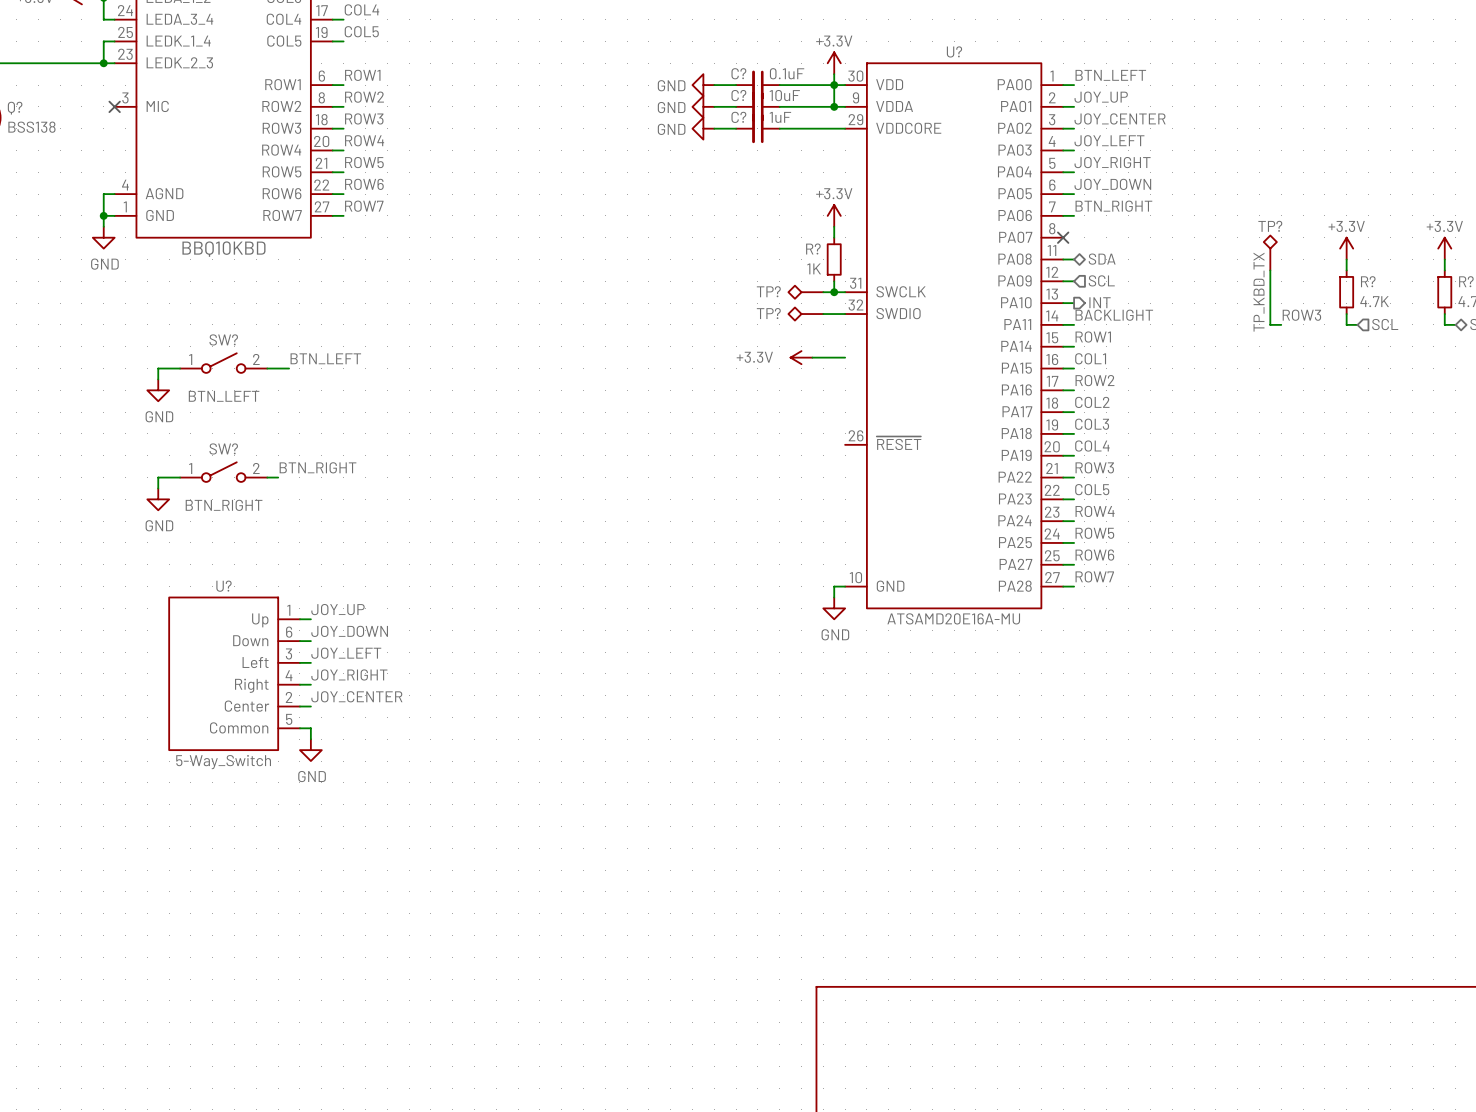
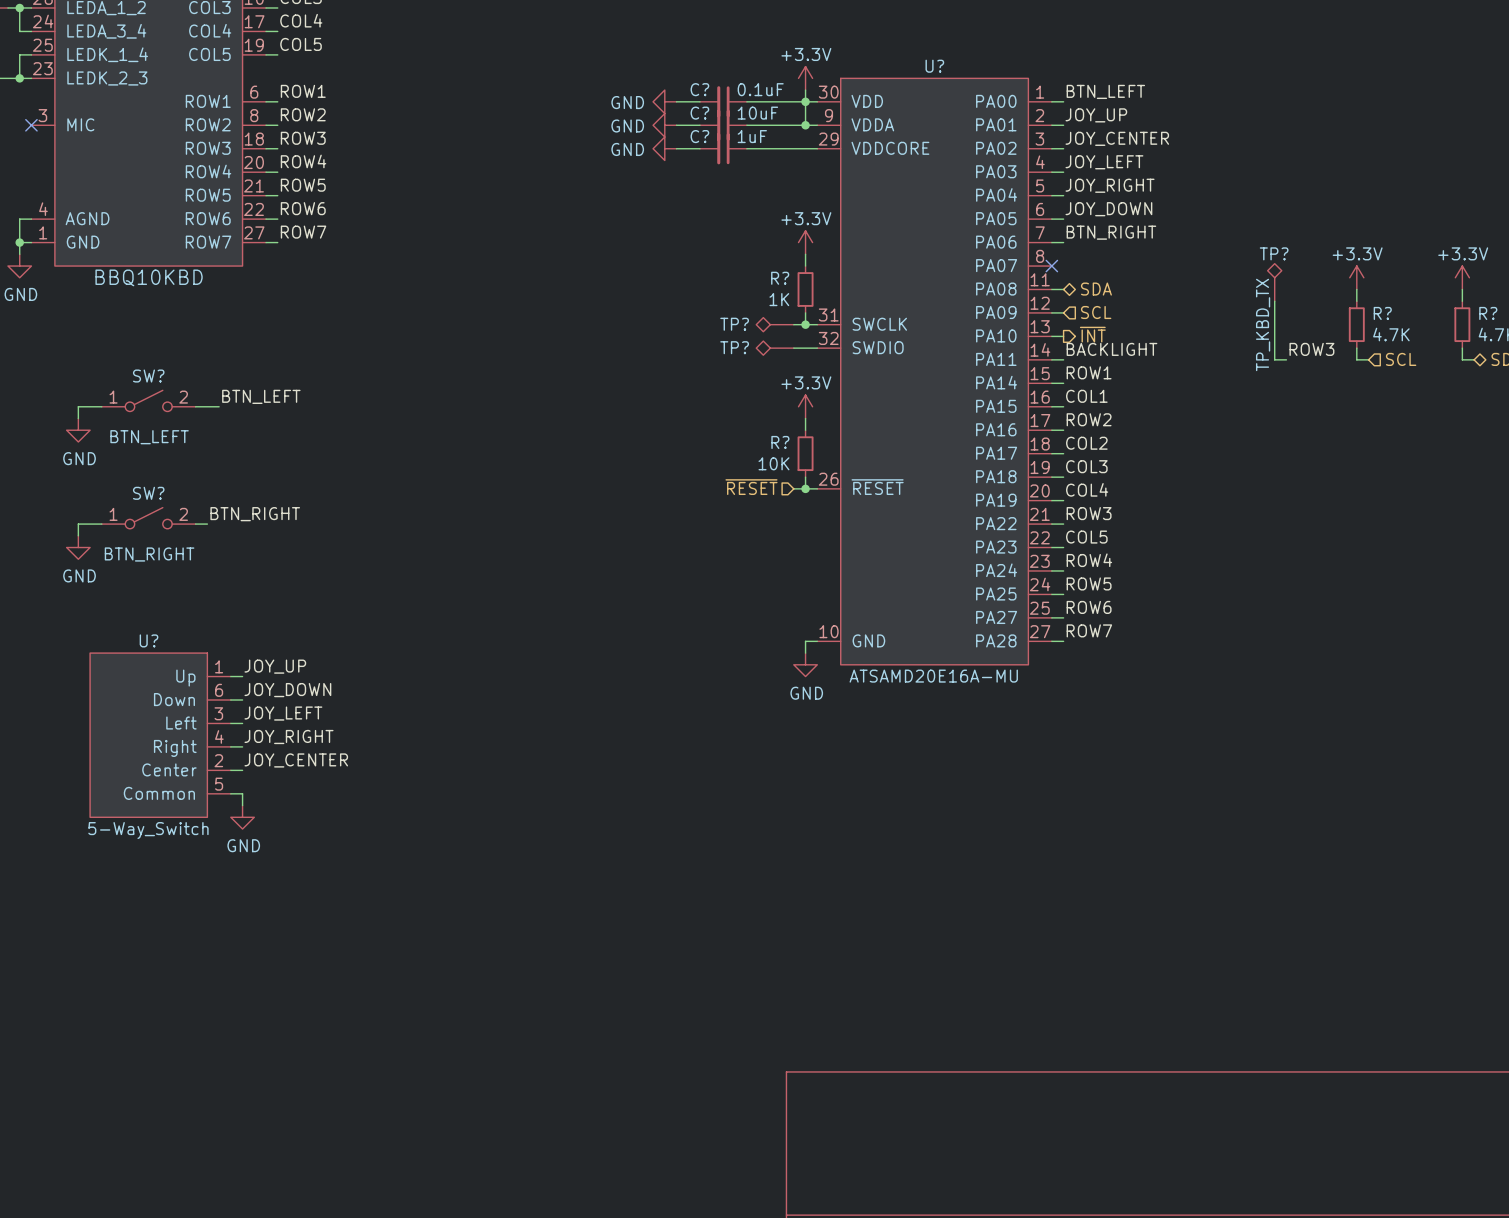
hierarchical label: INT (1100, 302) -> ~{INT} (1092, 334)
power symbol rotation: 0° (801, 357) -> 90° clockwise (805, 406)
power symbol position: +3.3V (801, 357) -> +3.3V (805, 406)
wire: (812, 357) (845, 357) -> none
wire: none -> (805, 418) (805, 430)
R?: none -> 10K (805, 453)
wire: none -> (805, 477) (805, 488)
hierarchical label: none -> ~{RESET} (751, 487)
wire: none -> (793, 488) (817, 488)
junction: none -> (805, 488)

